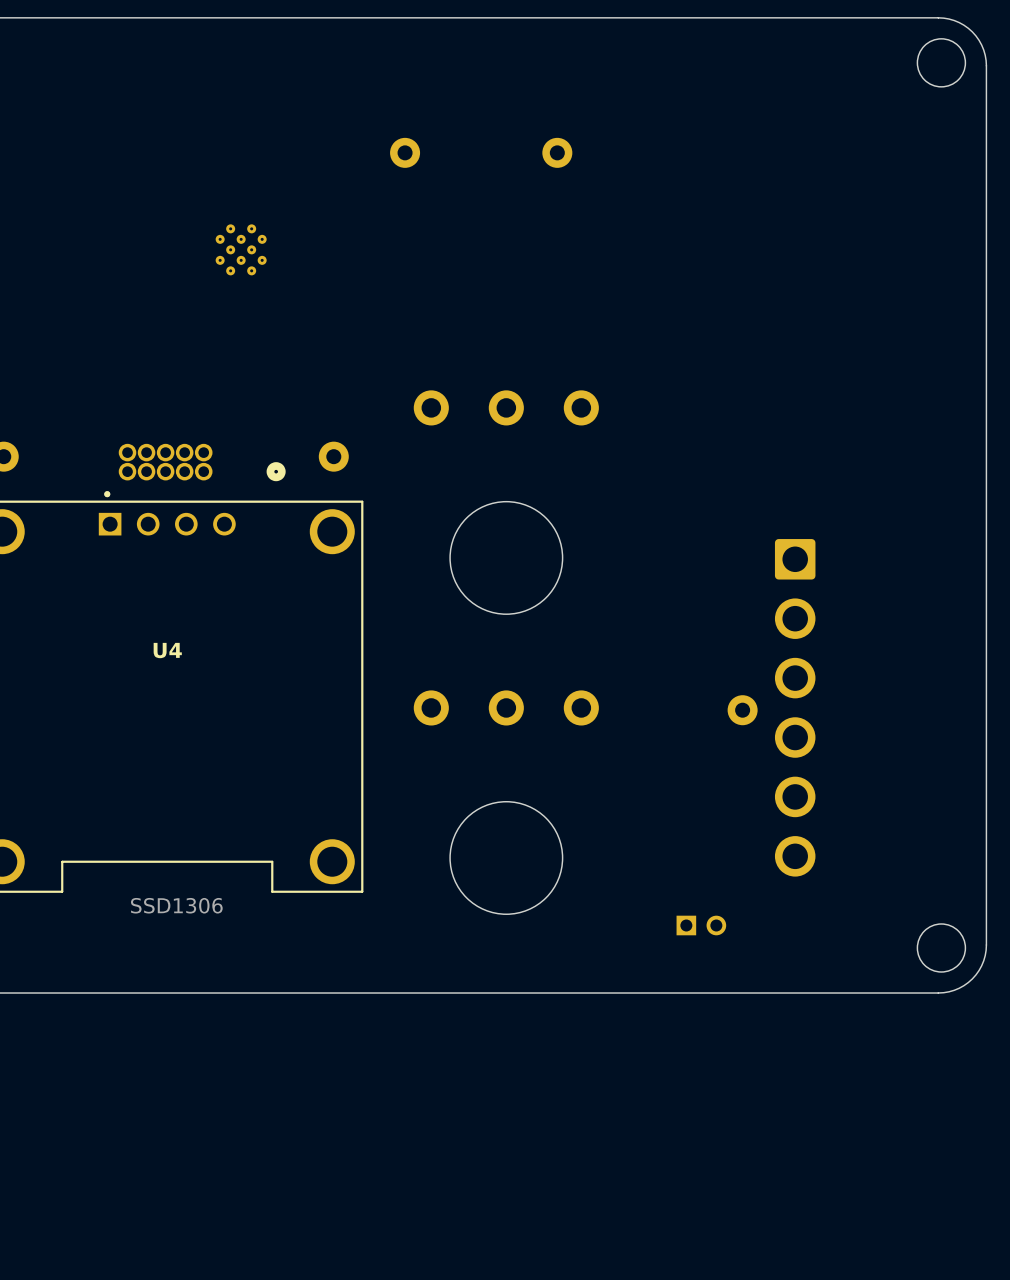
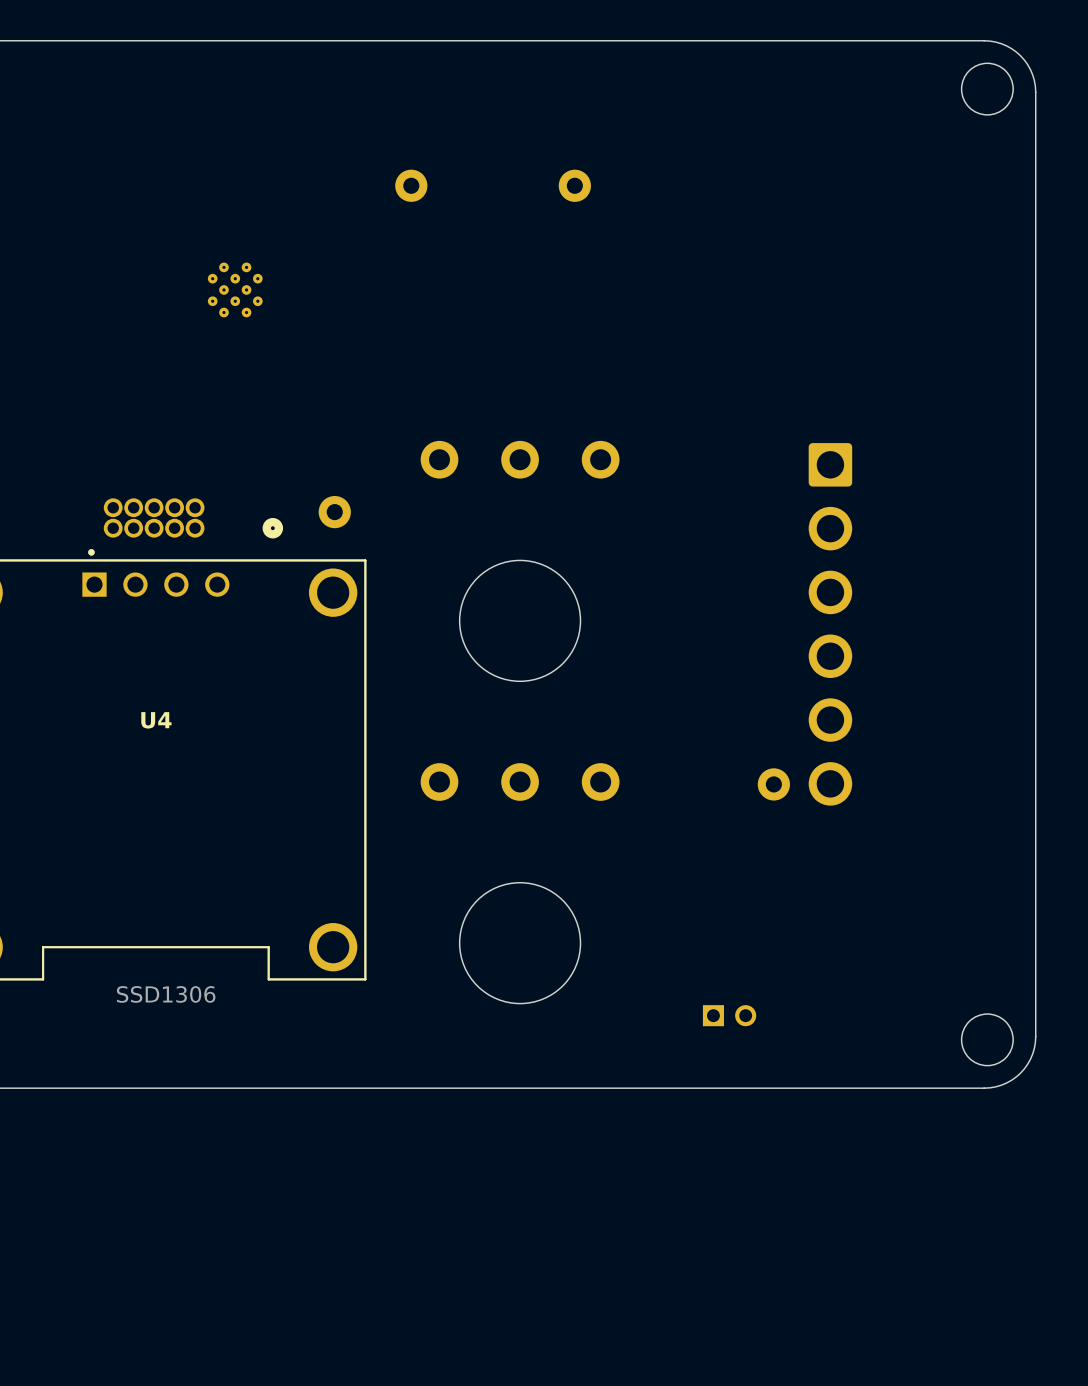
part position: (795, 707) -> (830, 624)

